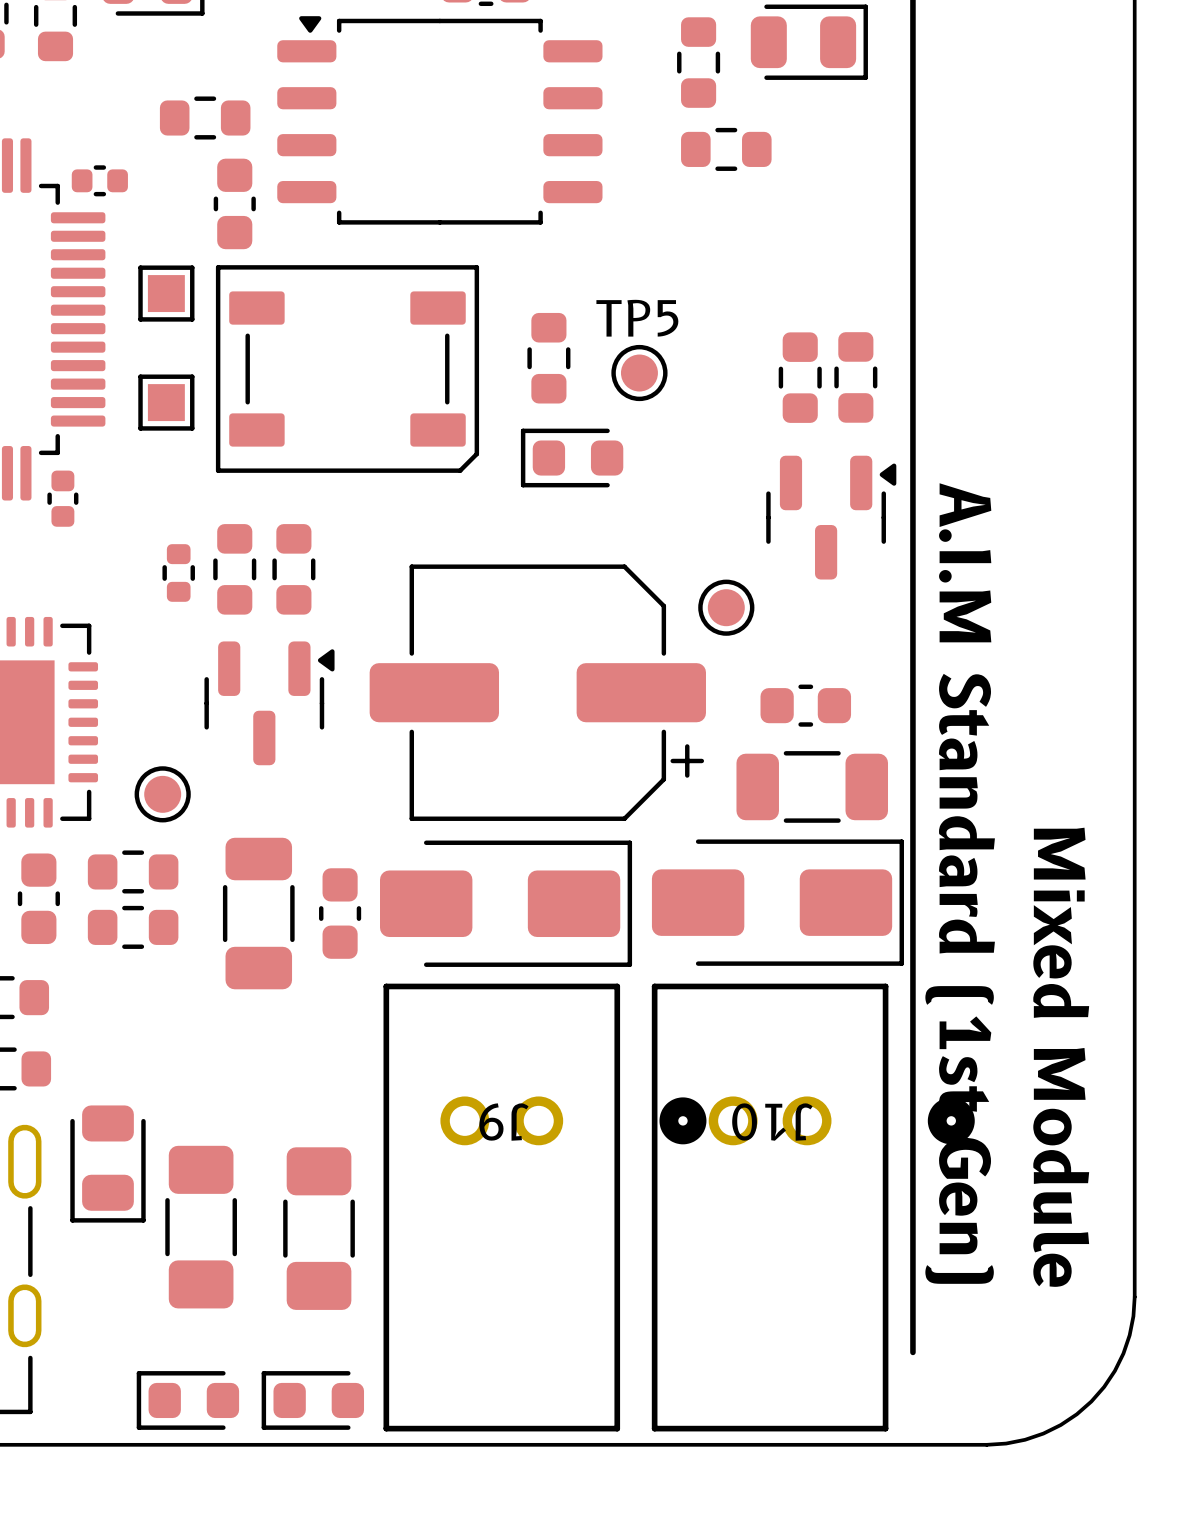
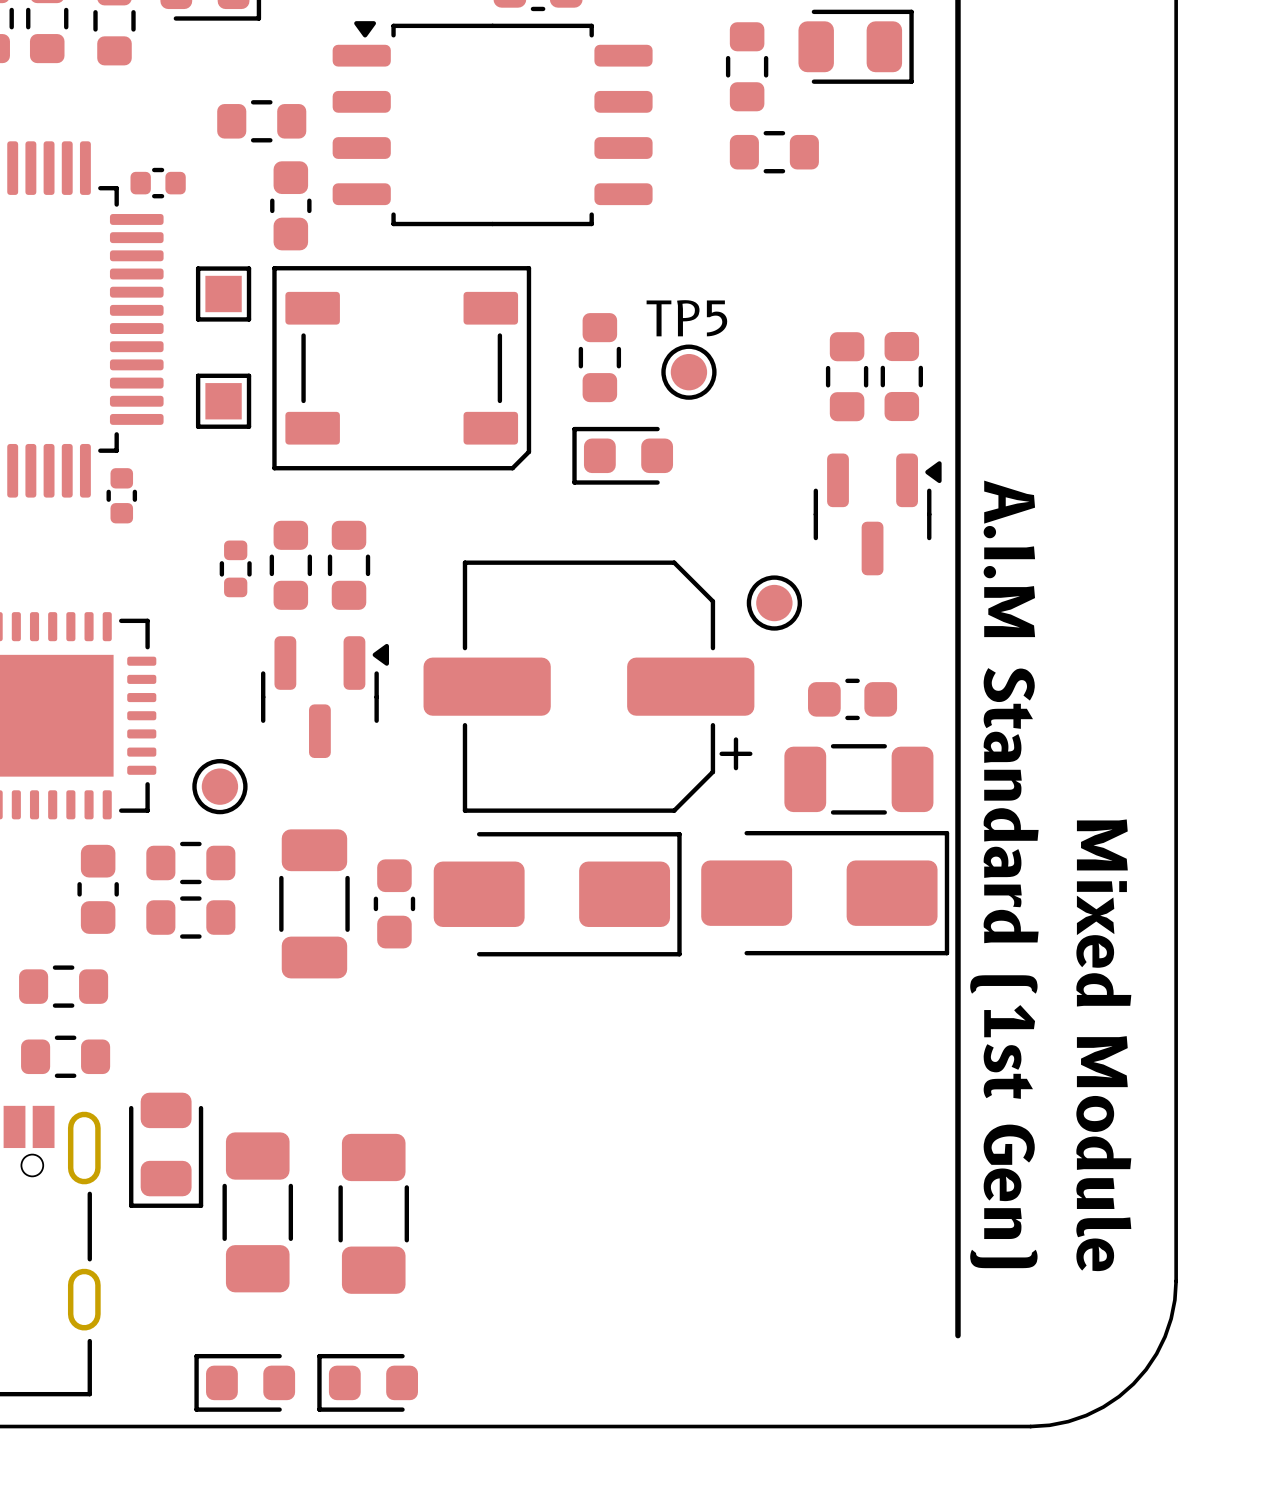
J9: (544, 1207) -> none
J10: (813, 1207) -> none

